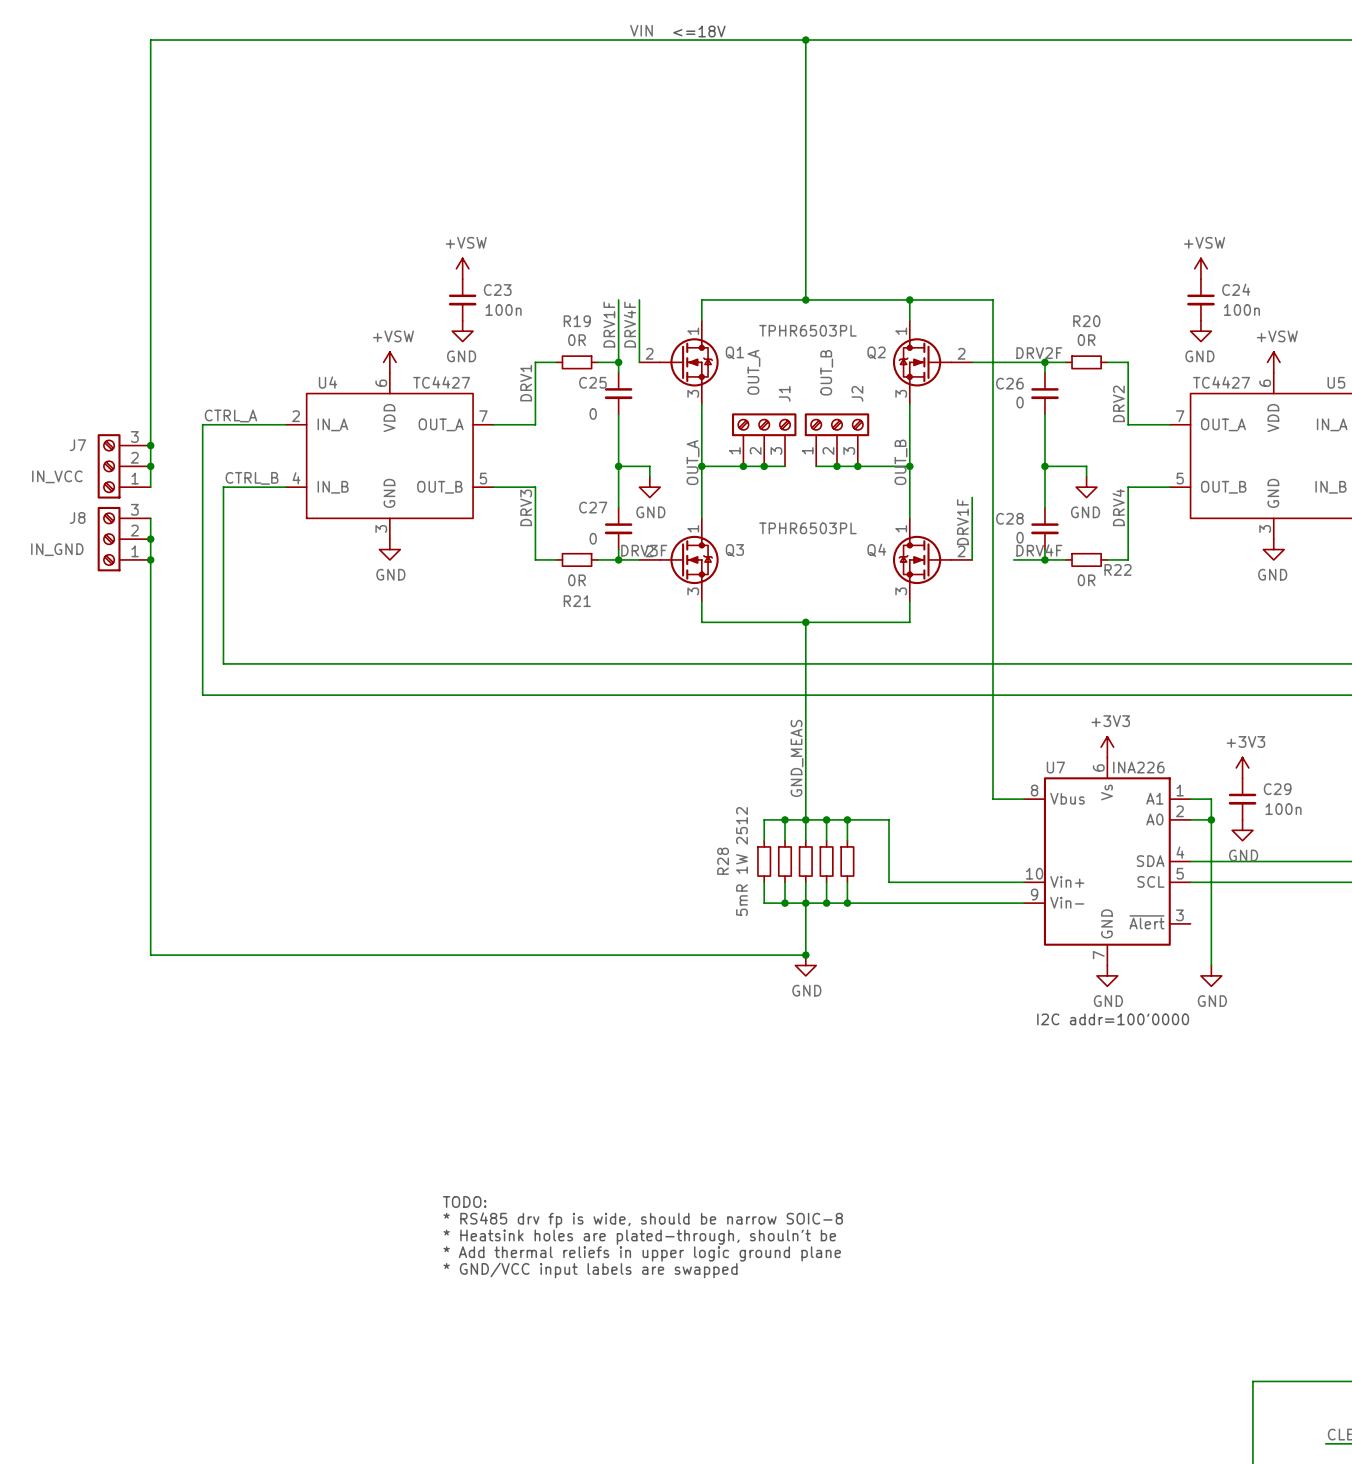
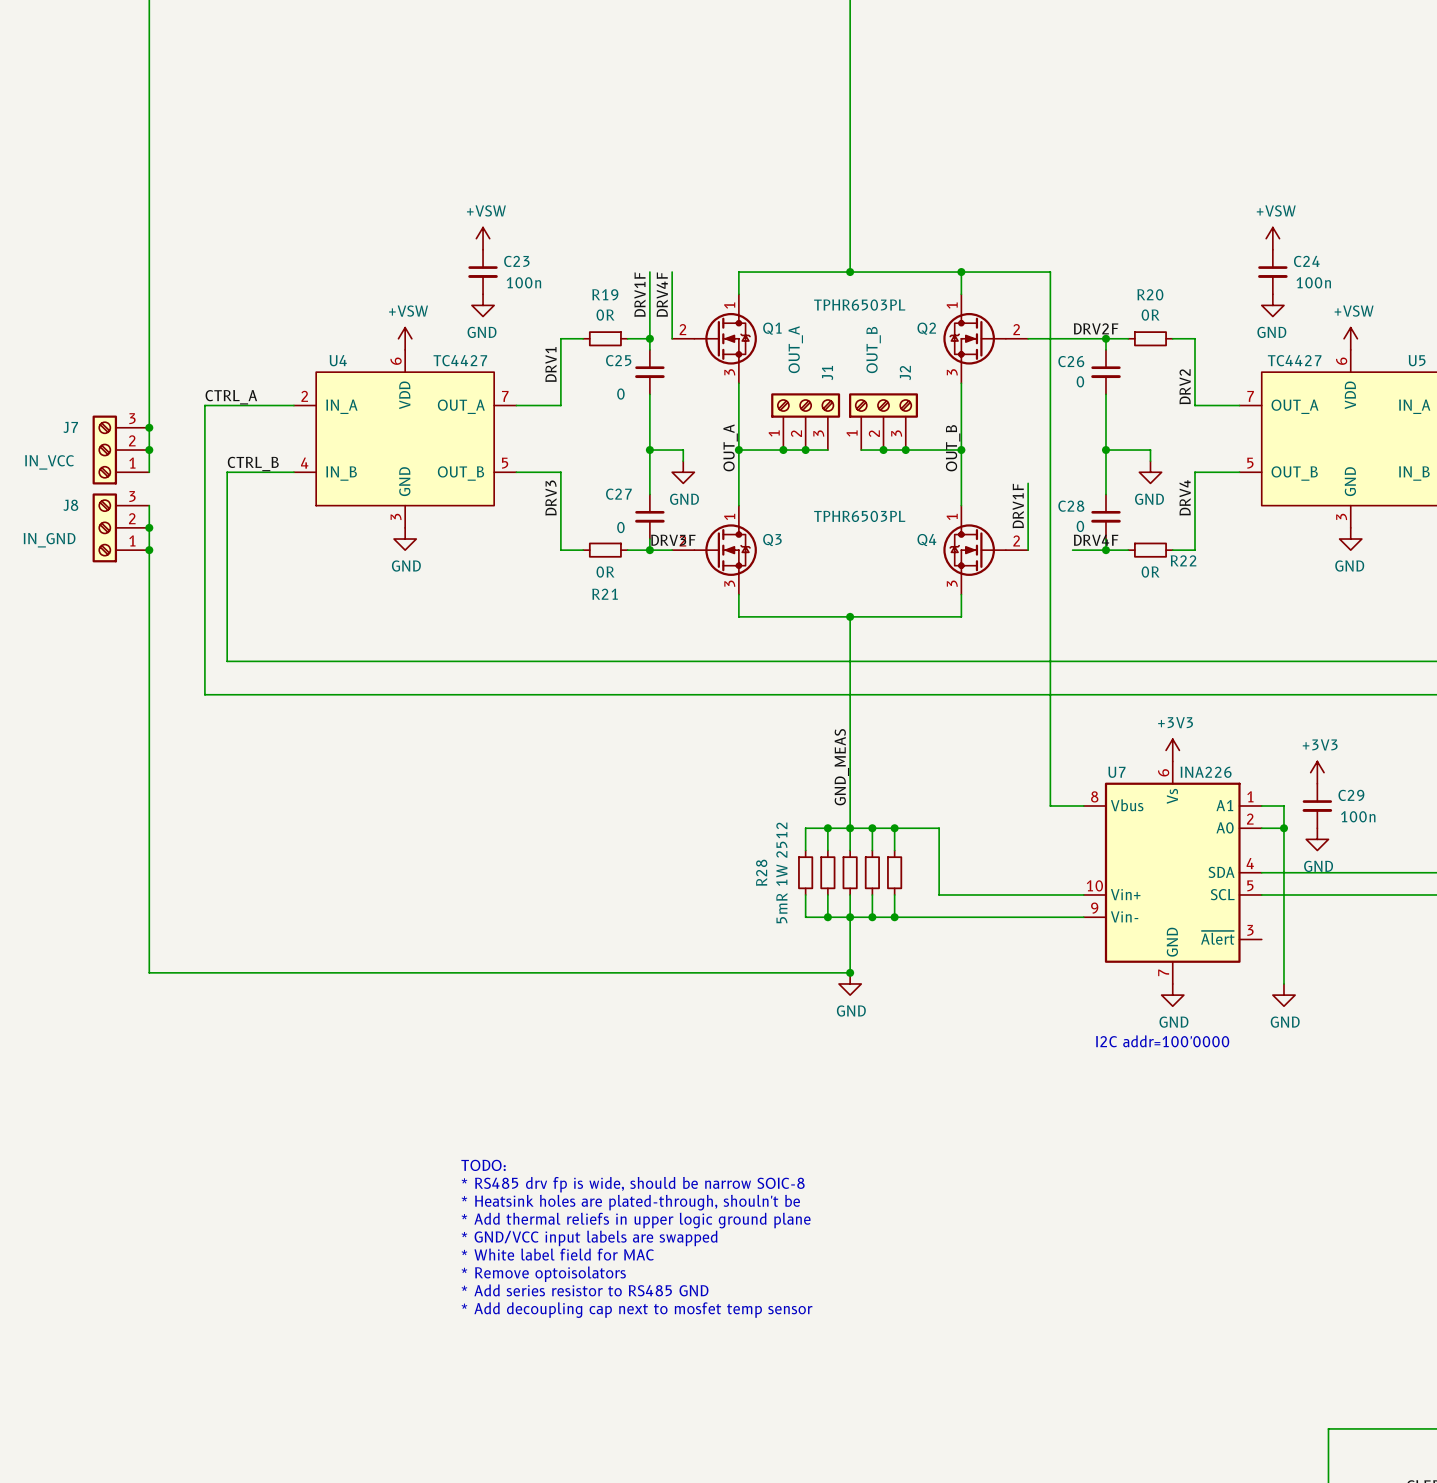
text: none -> TODO: (483, 1165)
text: none -> * RS485 drv fp is wide, should be narrow SOIC-8 (633, 1184)
text: none -> * Heatsink holes are plated-through, shouln't be (630, 1202)
text: none -> * Add thermal reliefs in upper logic ground plane (636, 1220)
text: TODO: (464, 1201) -> * GND/VCC input labels are swapped (589, 1238)
text: * RS485 drv fp is wide, should be narrow SOIC-8 (643, 1220) -> * White label field for MAC (557, 1254)
text: * Heatsink holes are plated-through, shouln't be (639, 1237) -> * Remove optoisolators (543, 1274)
text: * Add thermal reliefs in upper logic ground plane (642, 1253) -> * Add series resistor to RS485 GND (585, 1290)
text: * GND/VCC input labels are swapped (590, 1270) -> * Add decoupling cap next to mosfet temp sensor (637, 1310)

